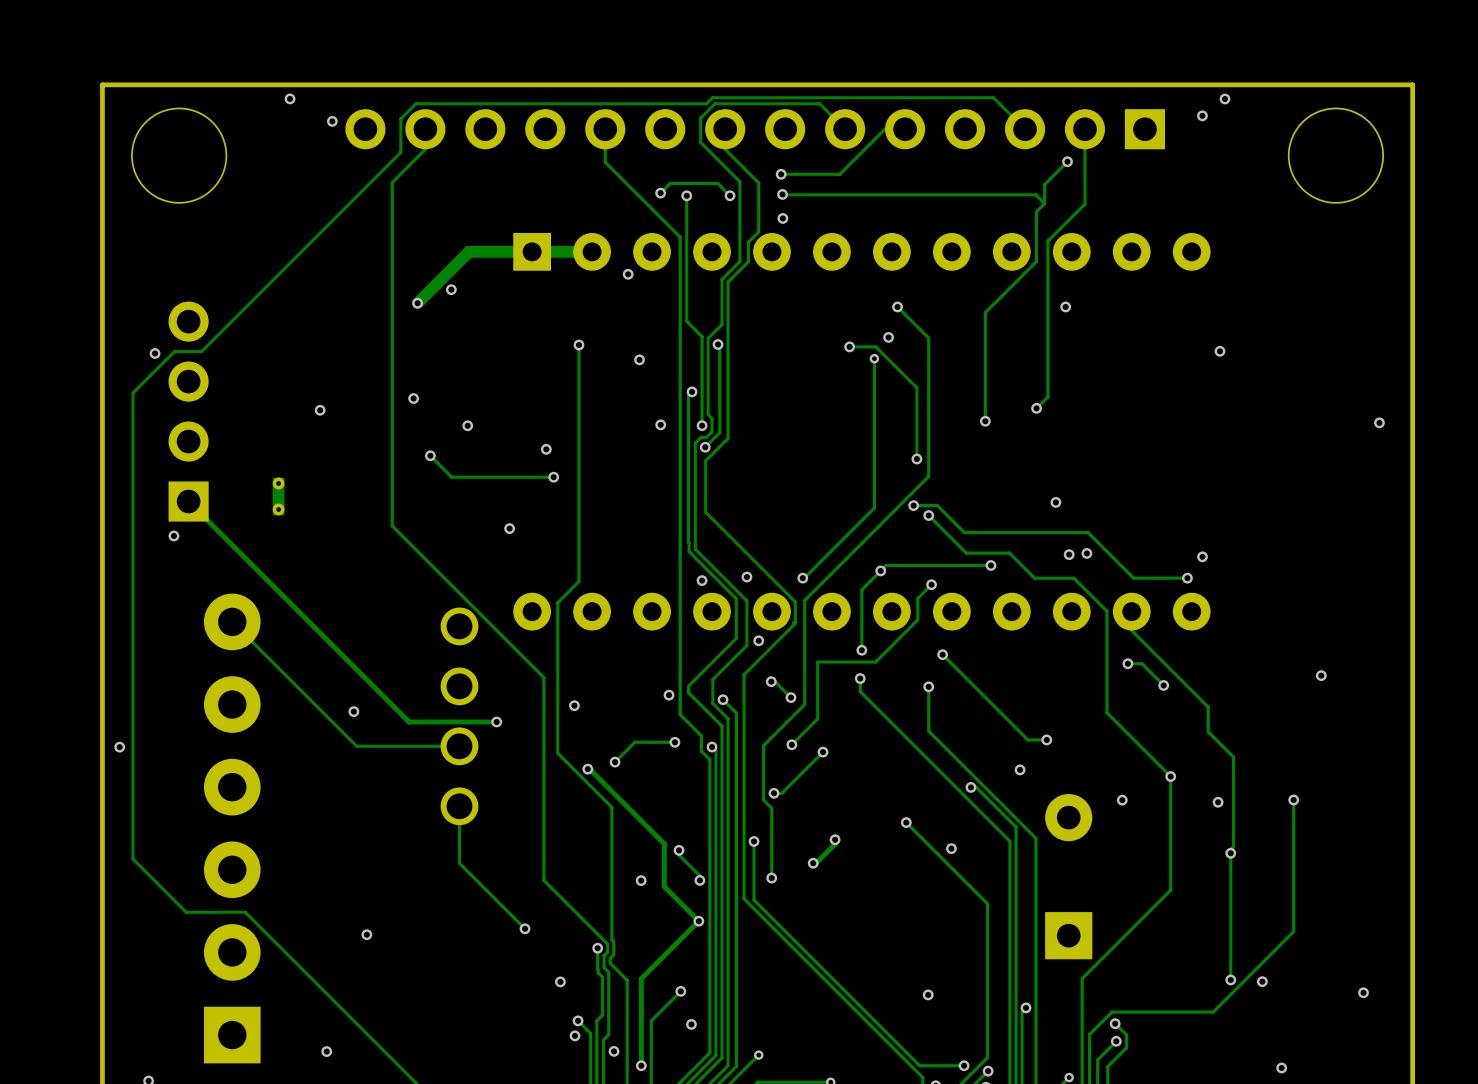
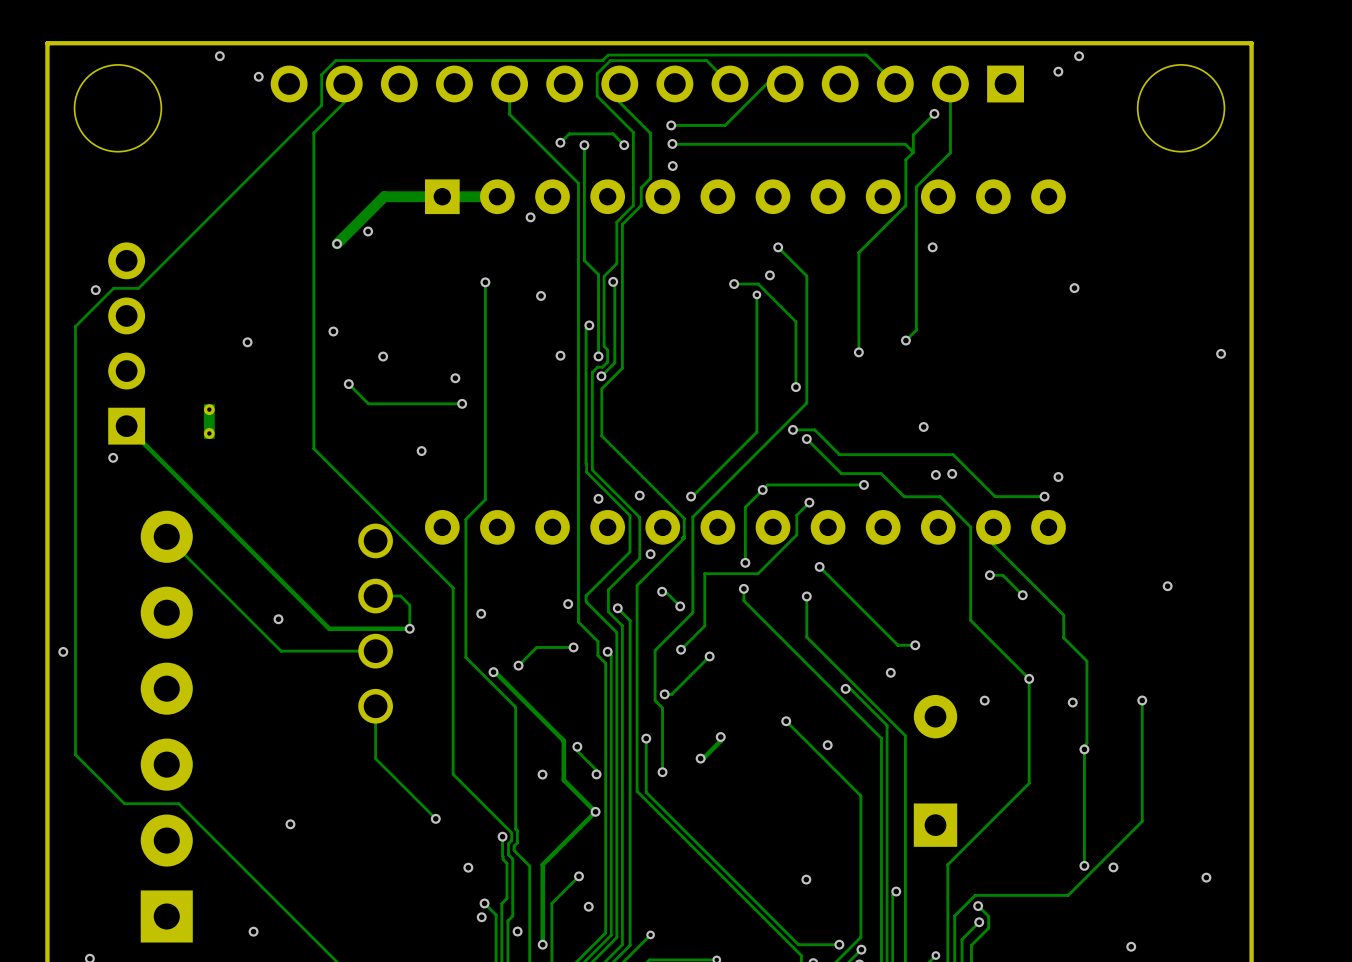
track: none -> (375, 596) (400, 596) (409, 605) (409, 628)

